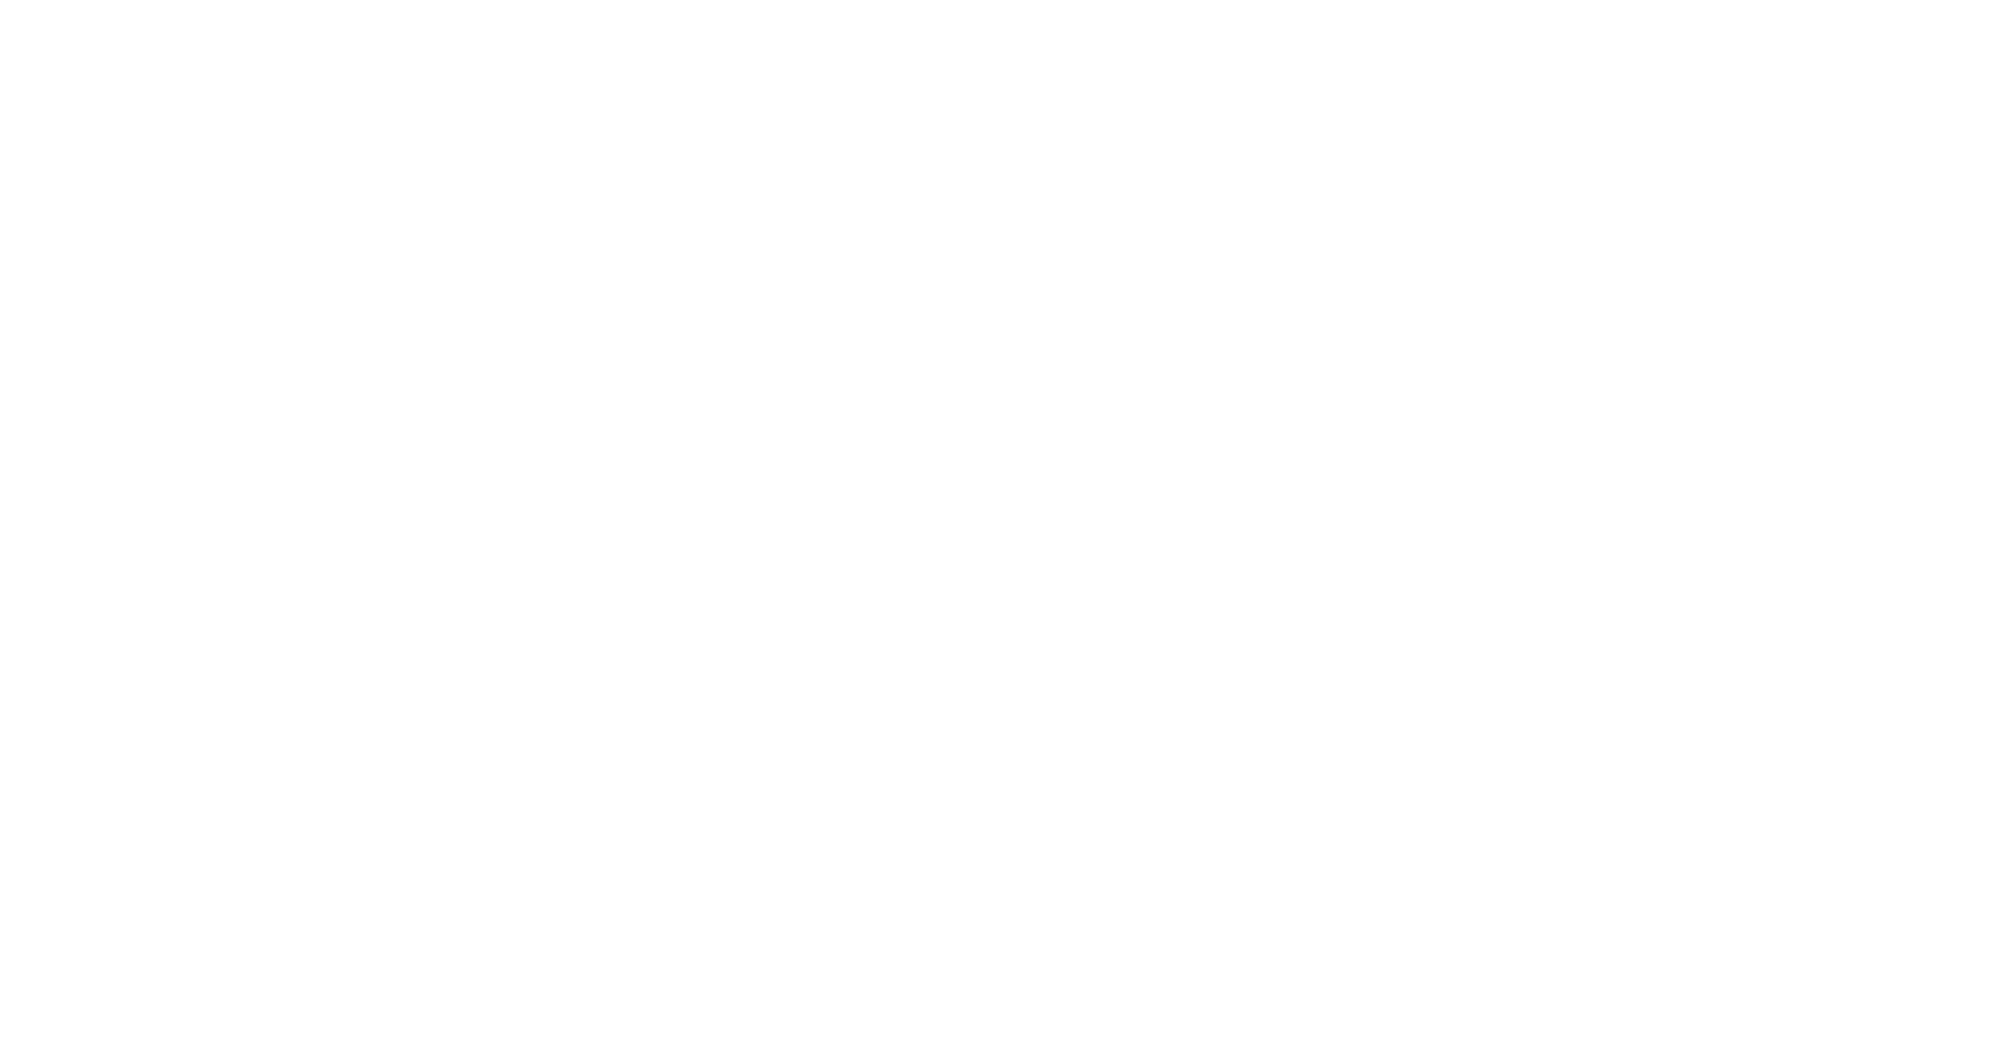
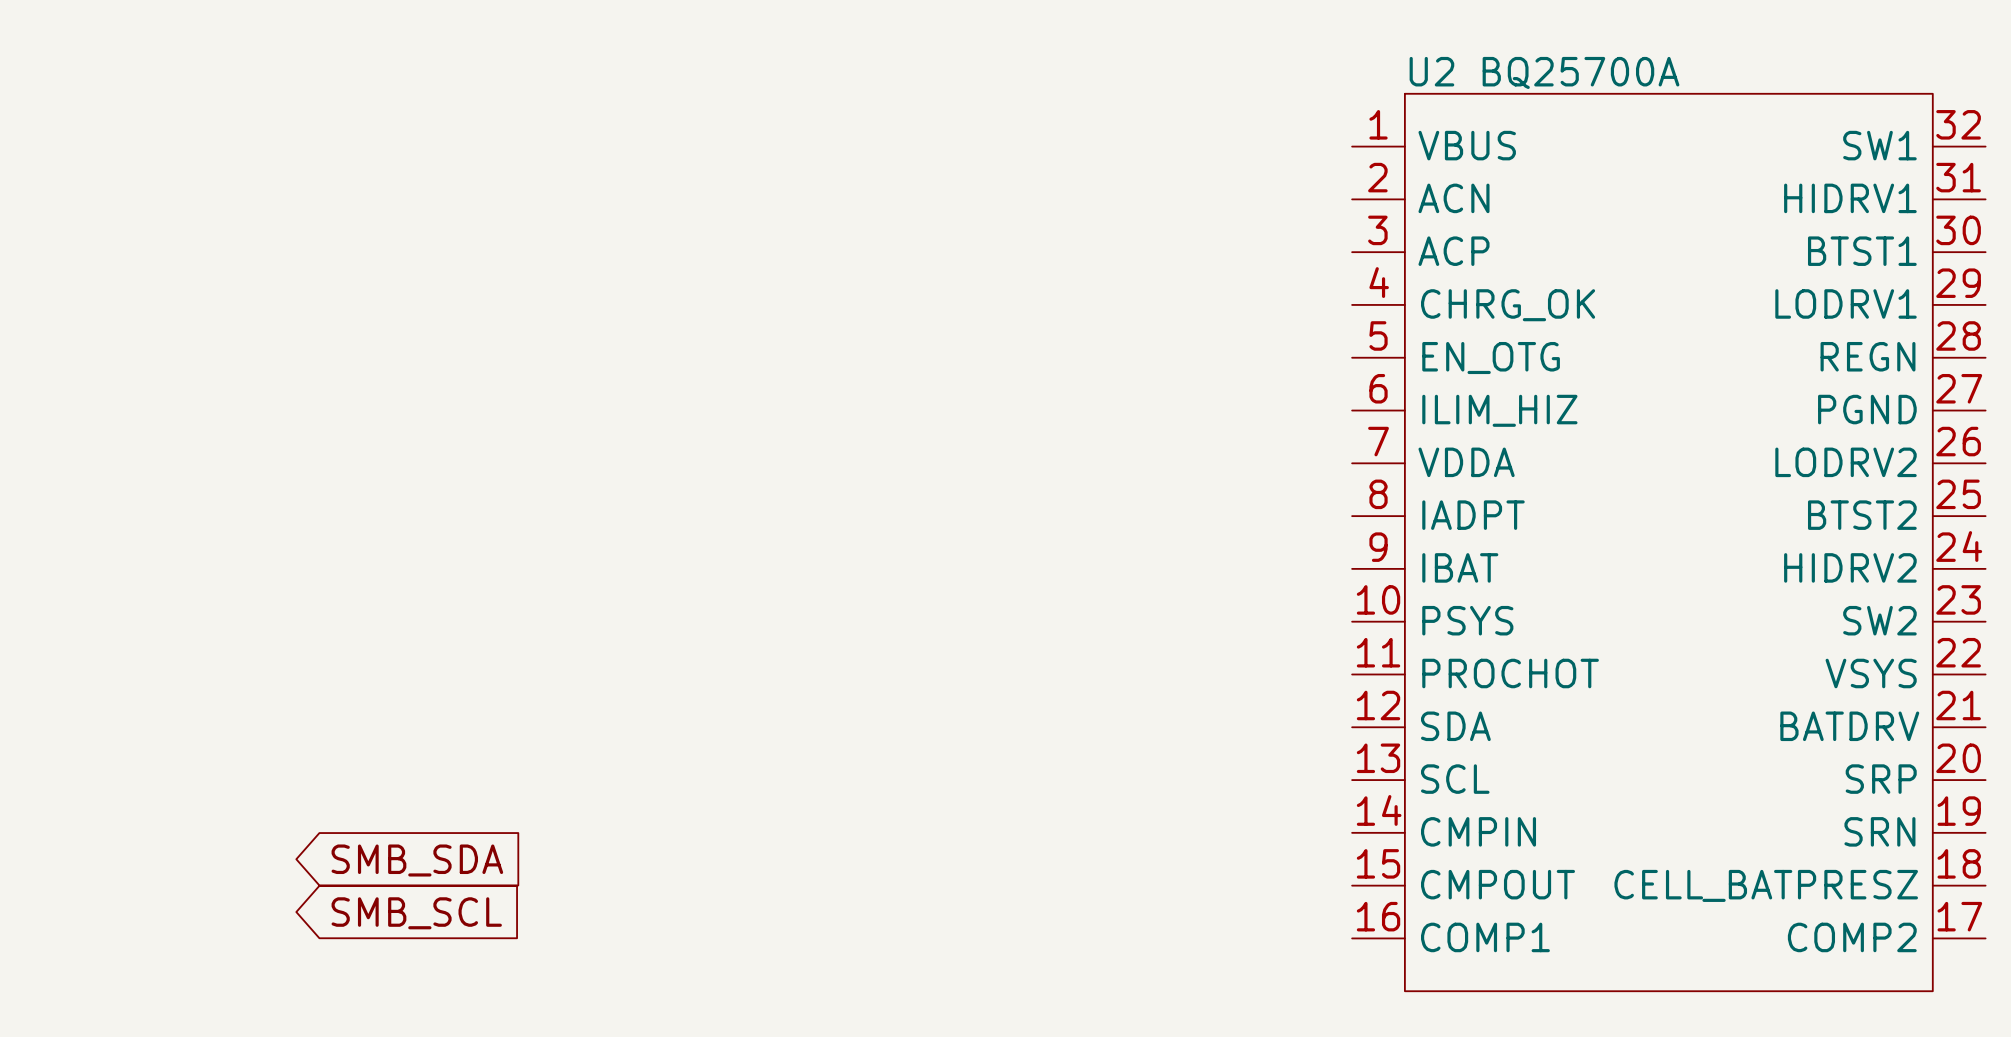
U2: none -> BQ25700A (1668, 542)
global label: none -> SMB_SDA (417, 860)
global label: none -> SMB_SCL (416, 913)

